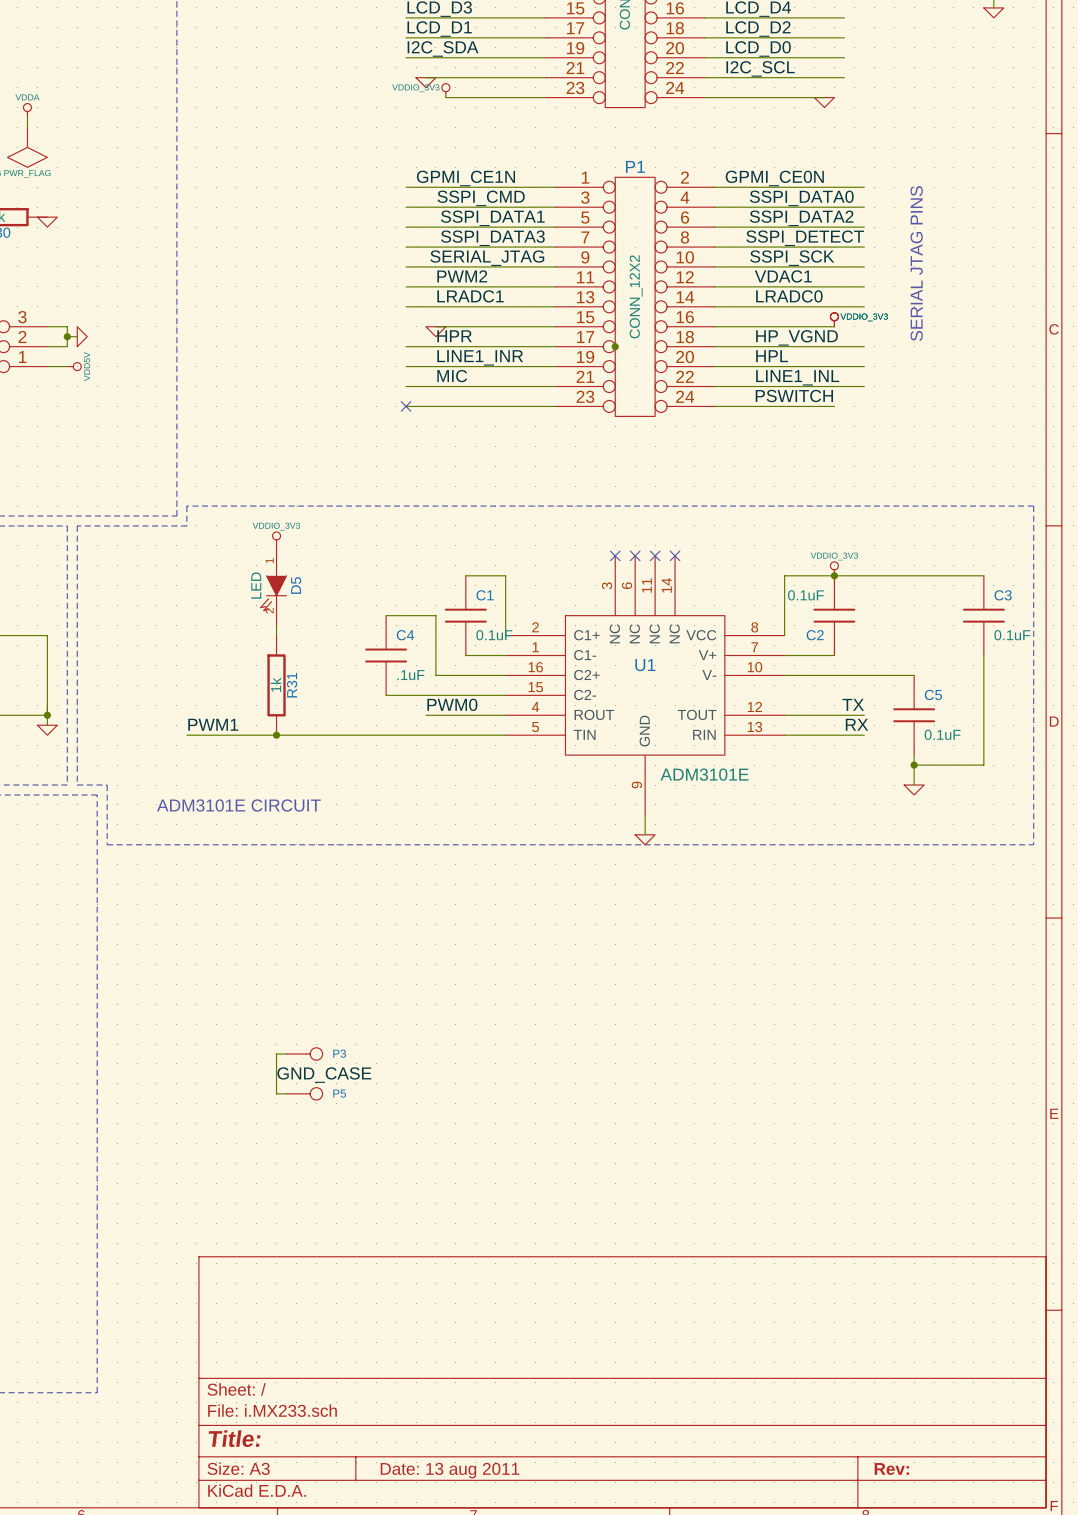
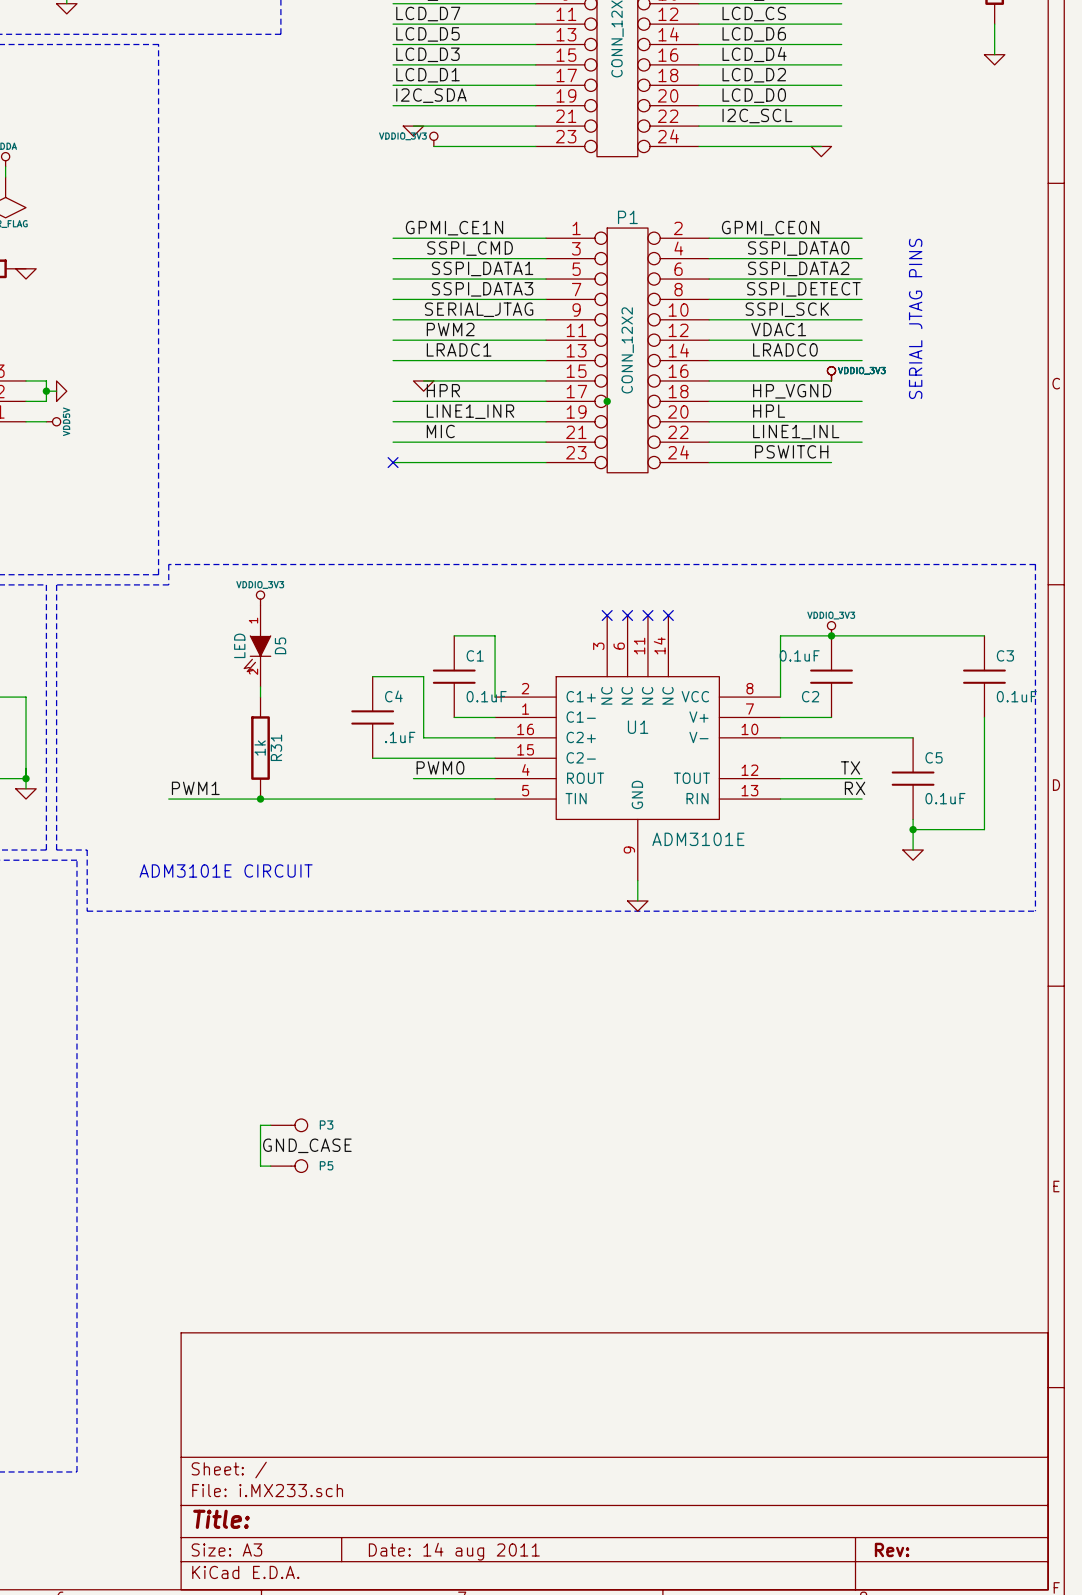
title block: Date: 13 aug 2011 (450, 1470) -> Date: 14 aug 2011 (454, 1551)

